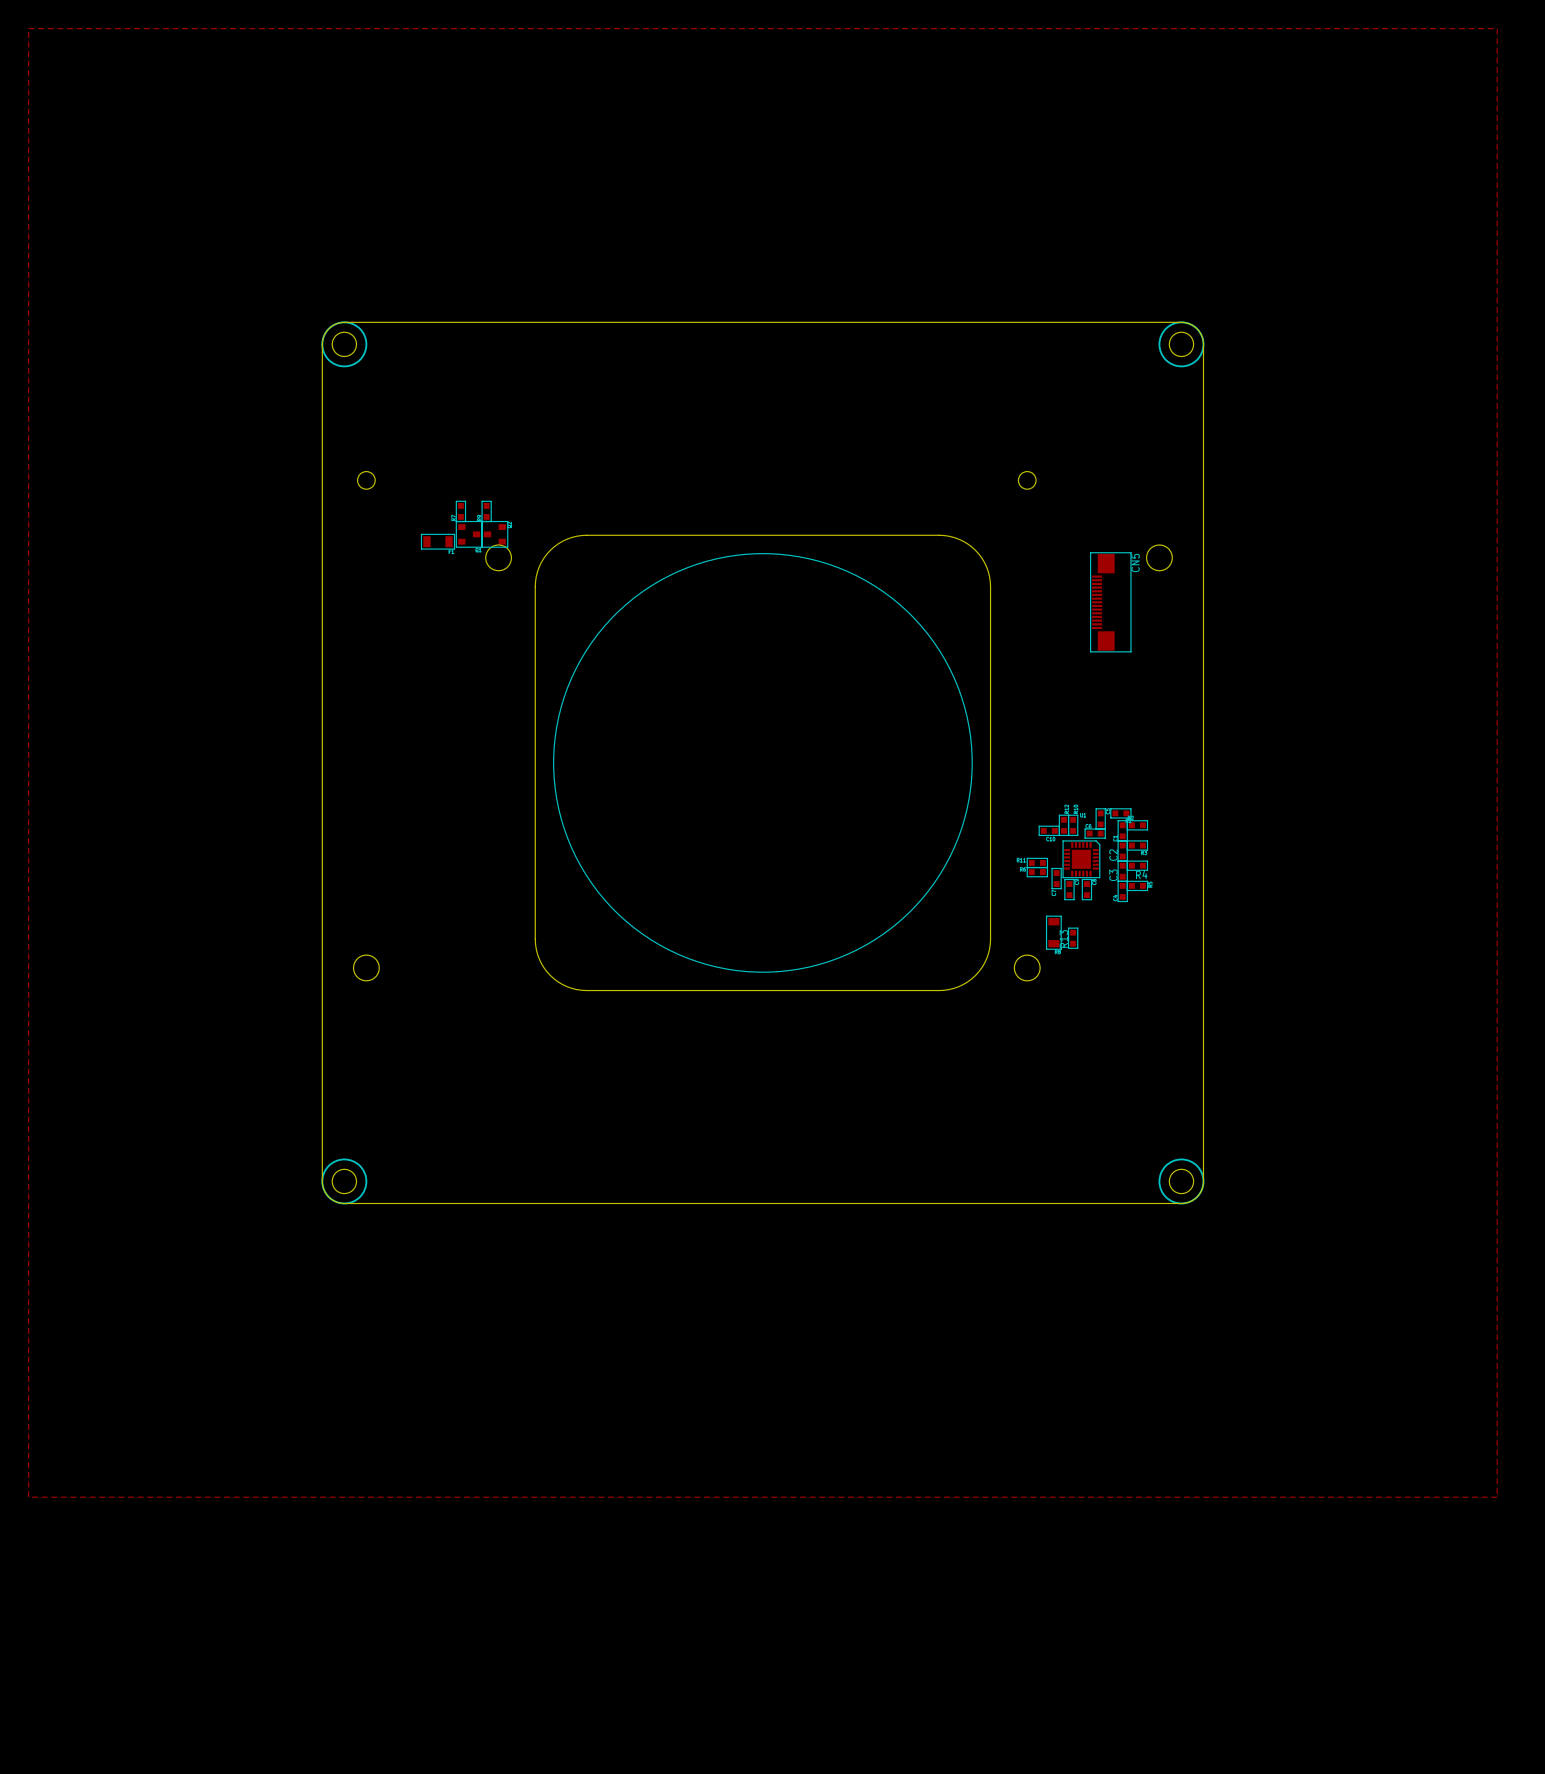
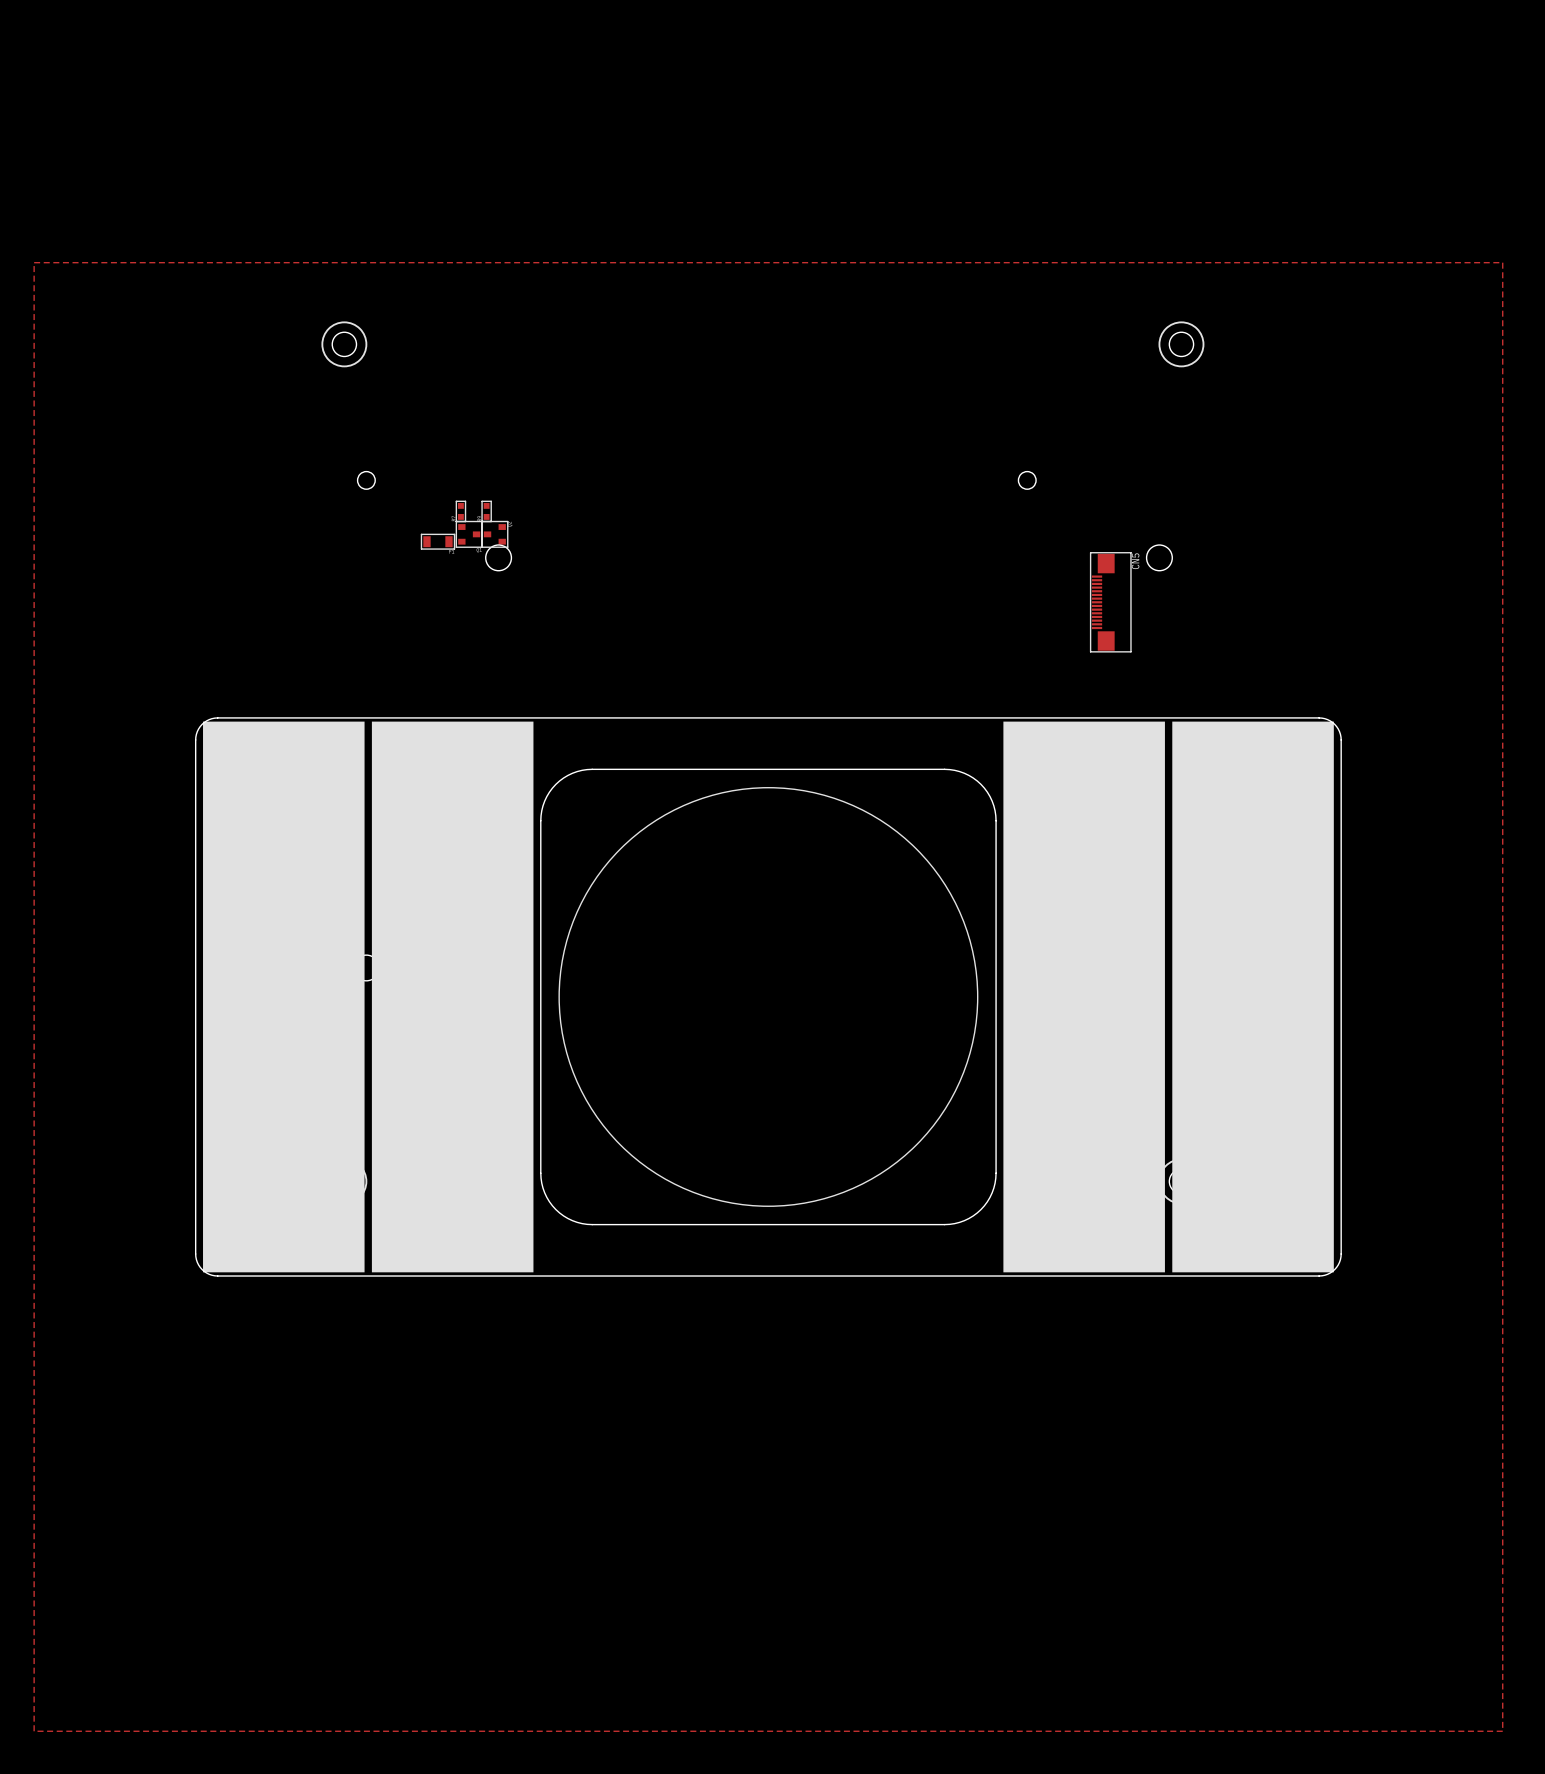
zone outline: (28, 28) (1497, 28) (1497, 1497) (28, 1497) (28, 28) -> (34, 262) (1502, 262) (1502, 1731) (34, 1731) (34, 262)
board edge: (344, 322) (1181, 322) (1189, 324) (1197, 328) (1201, 335) (1203, 344) (1203, 1181) (1201, 1189) (1197, 1197) (1189, 1201) (1181, 1203) (344, 1203) (335, 1201) (328, 1197) (324, 1189) (322, 1181) (322, 344) (324, 335) (328, 328) (335, 324) (344, 322) -> none
board edge: (586, 535) (939, 535) (958, 539) (978, 554) (986, 567) (990, 586) (990, 939) (986, 958) (971, 978) (958, 986) (939, 990) (586, 990) (567, 986) (546, 971) (539, 958) (535, 939) (535, 581) (541, 562) (554, 546) (567, 539) (586, 535) -> none
drawing: [553, 553, 973, 973] -> none
board edge: none -> (217, 717) (1319, 717) (1327, 719) (1336, 726) (1341, 739) (1341, 1253) (1339, 1262) (1332, 1271) (1319, 1276) (217, 1276) (209, 1274) (200, 1267) (195, 1253) (195, 739) (197, 731) (202, 724) (209, 719) (217, 717)
drawing: none -> [203, 721, 534, 1273]
drawing: none -> [1003, 721, 1334, 1273]
board edge: none -> (592, 769) (944, 769) (964, 773) (984, 788) (992, 801) (996, 820) (996, 1173) (992, 1192) (977, 1212) (964, 1220) (944, 1224) (592, 1224) (572, 1220) (552, 1205) (544, 1192) (540, 1173) (541, 815) (546, 796) (559, 781) (572, 773) (592, 769)
drawing: none -> [558, 787, 979, 1207]

